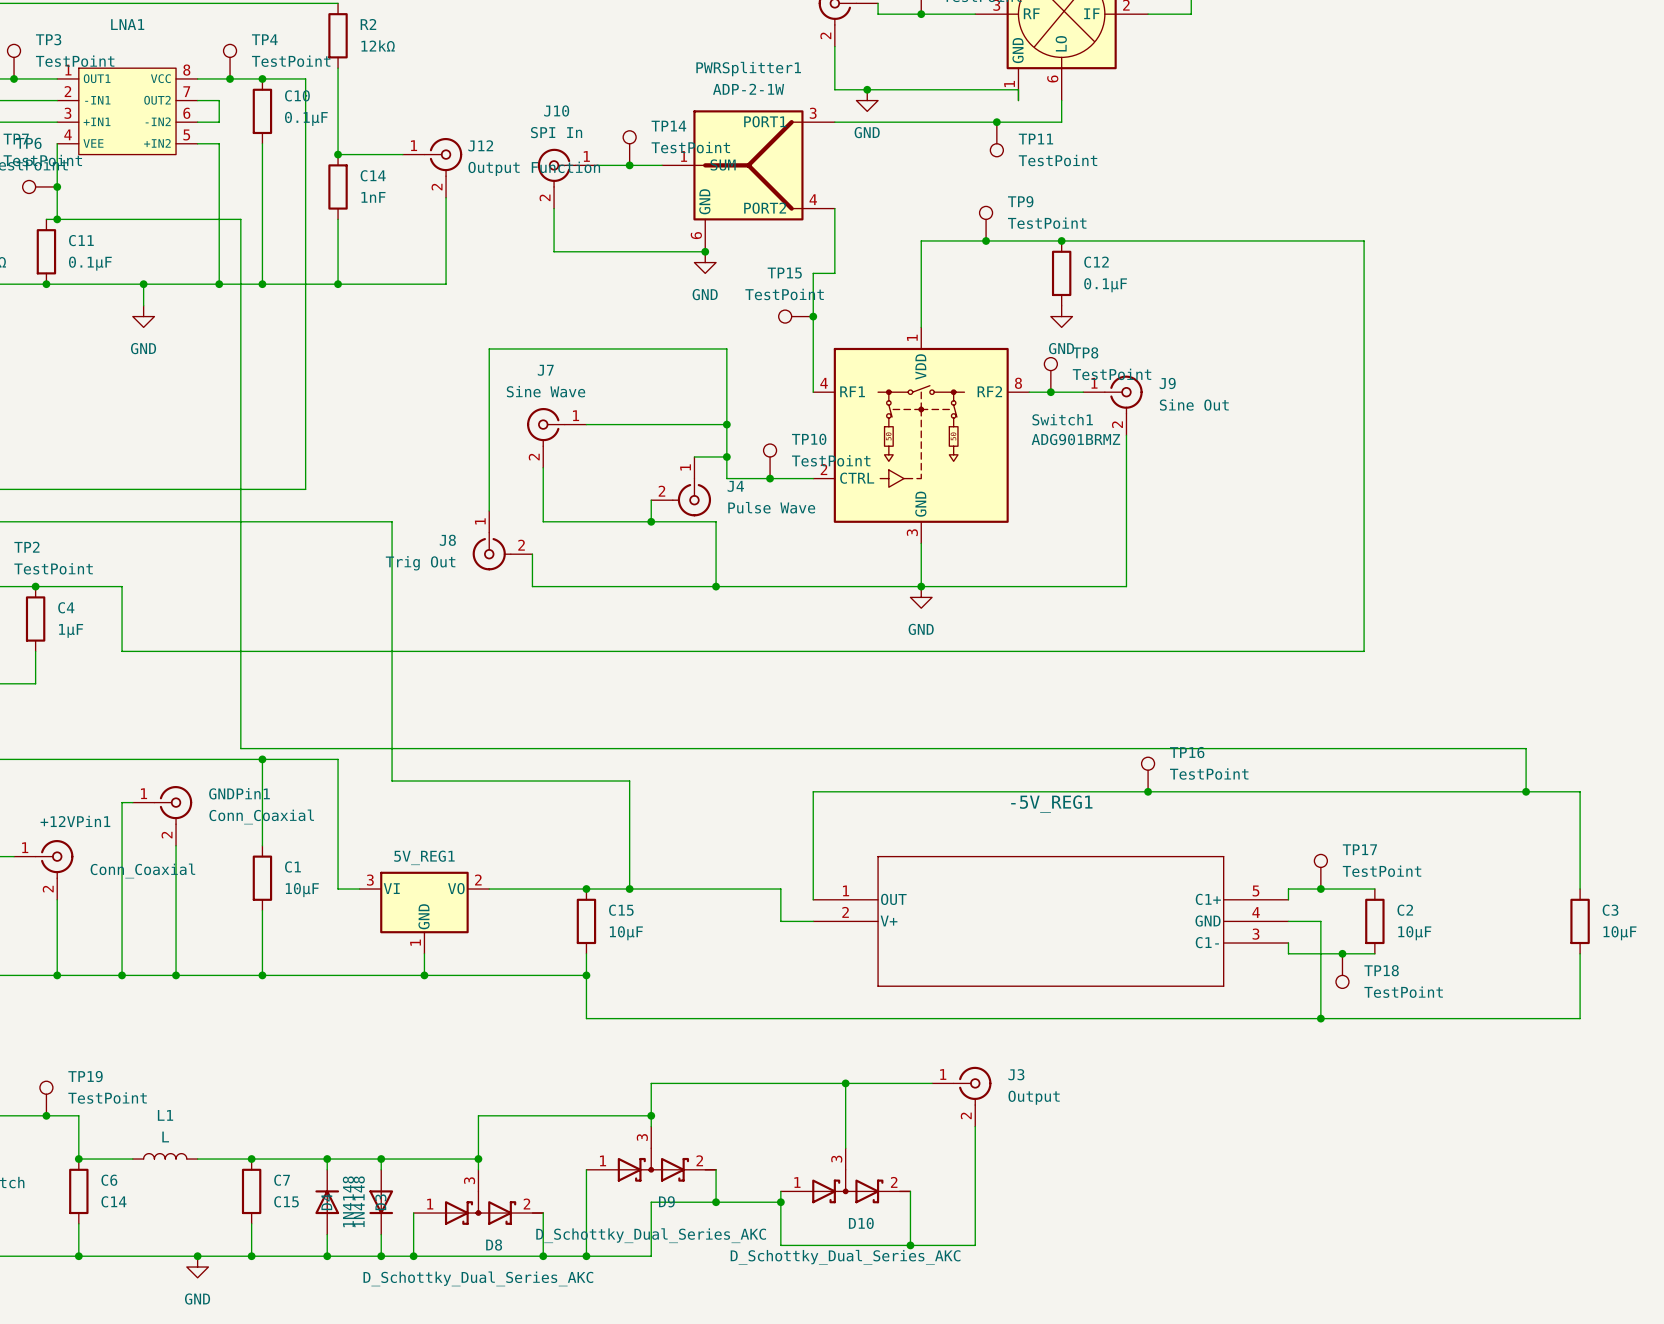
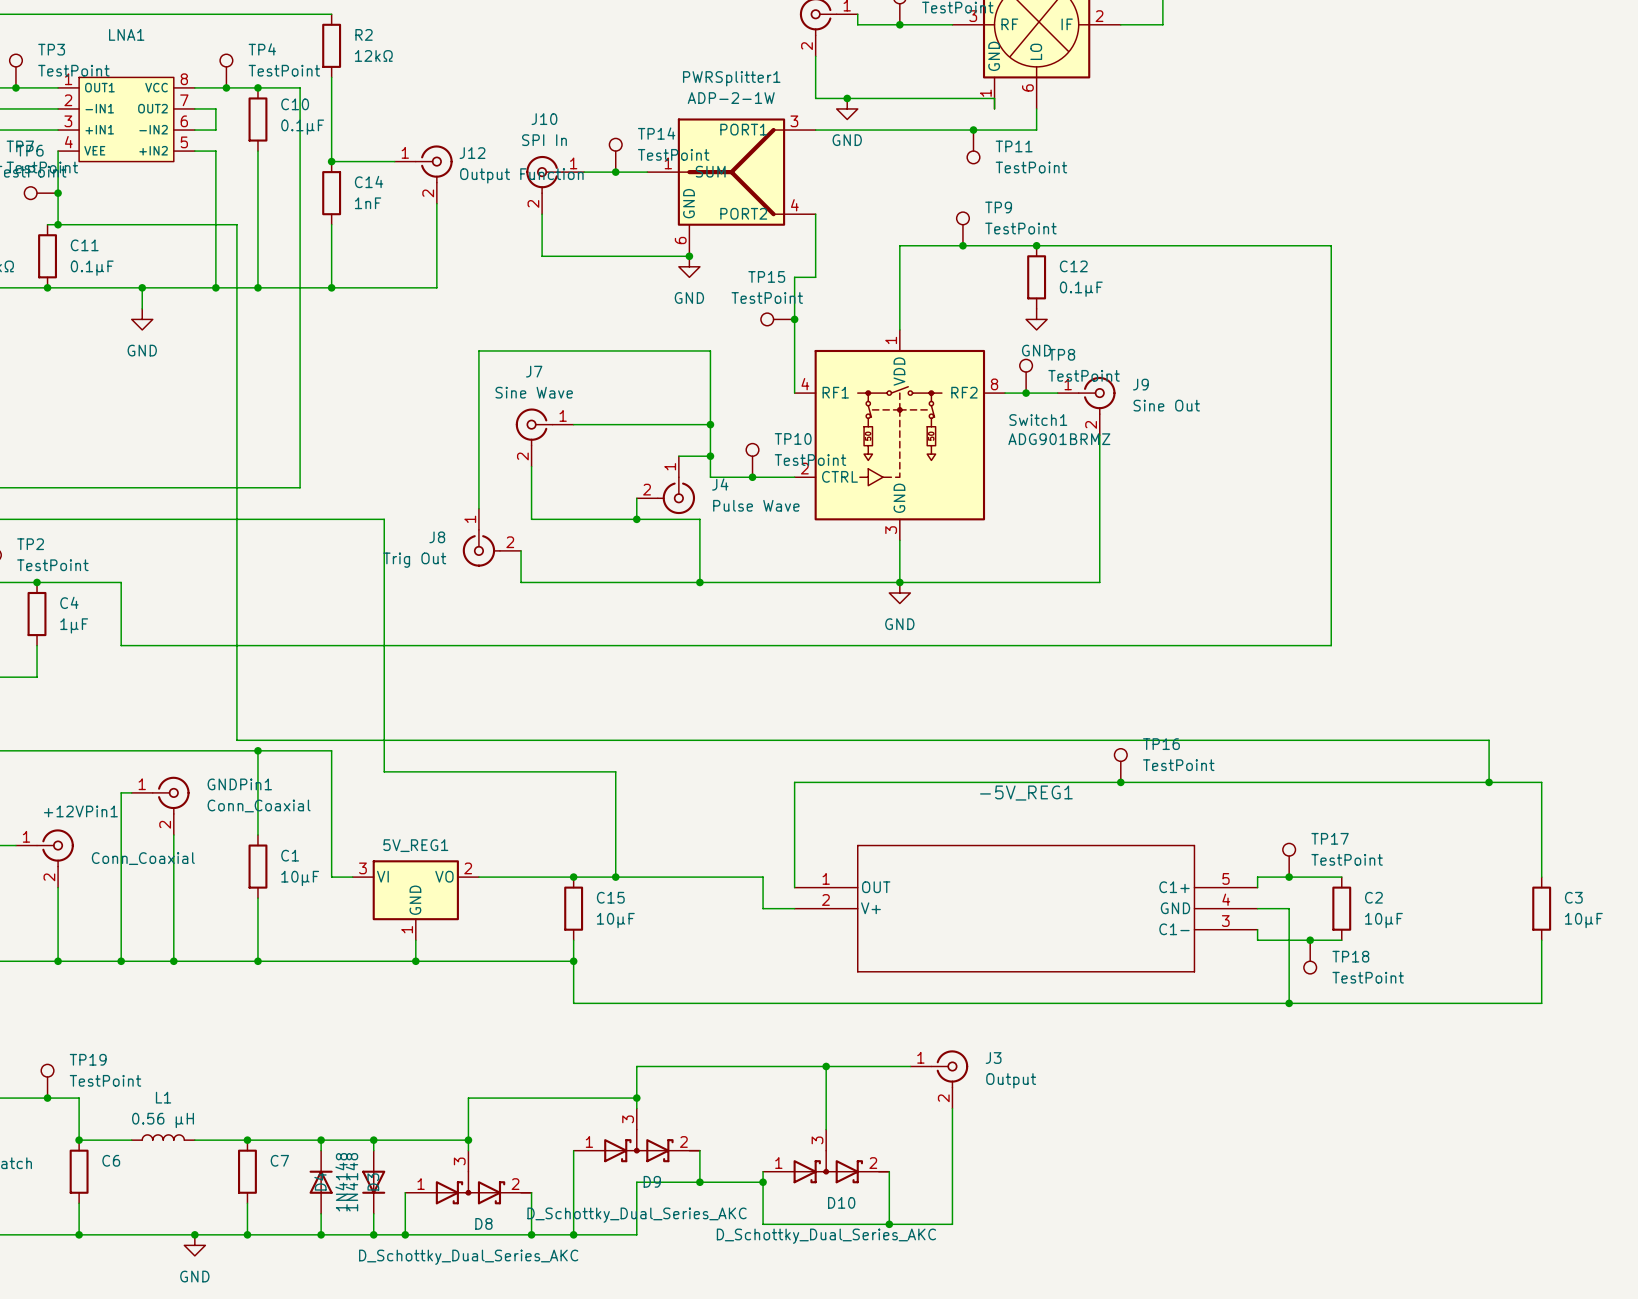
L1 value: L (165, 1137) -> 0.56 μH (163, 1120)
C6 value: C14 (113, 1201) -> none
C7 value: C15 (286, 1201) -> none

